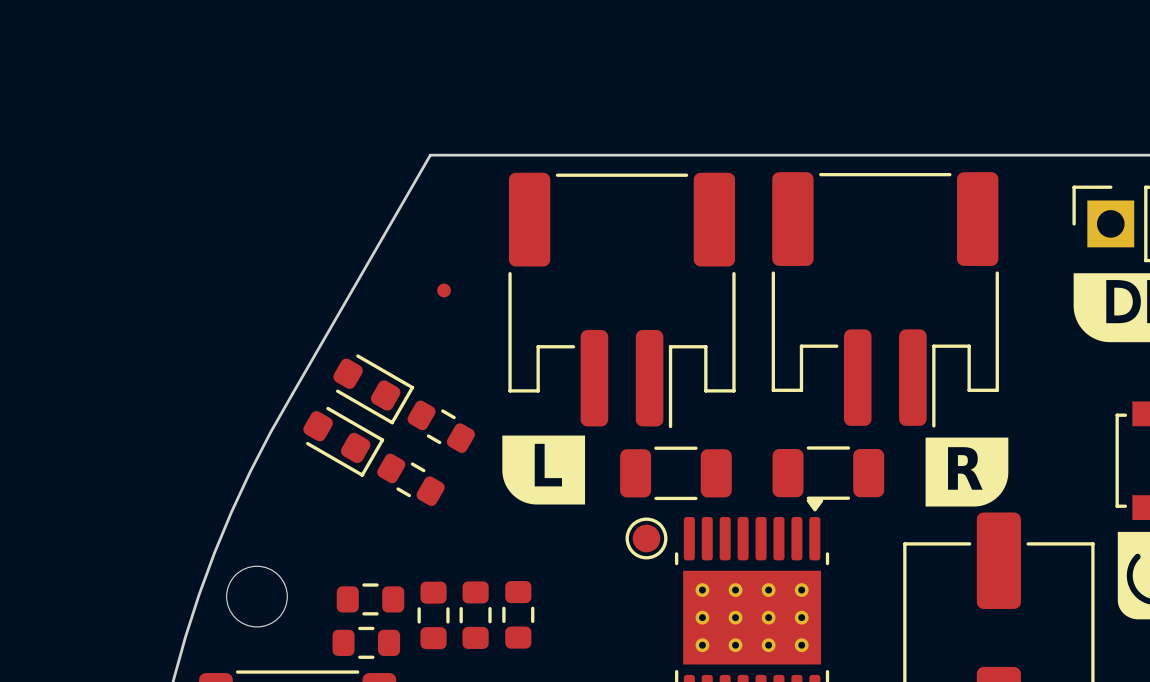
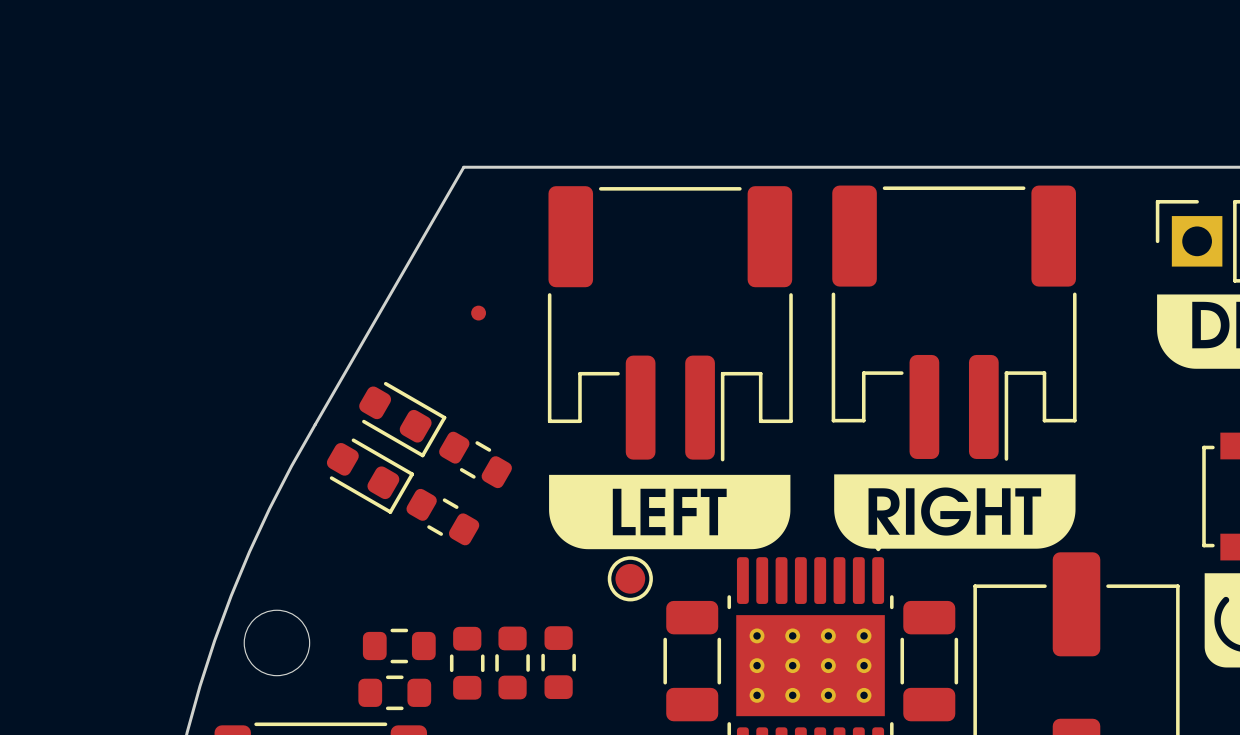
drawing: [502, 435, 586, 505] -> none
drawing: [925, 437, 1009, 507] -> none
drawing: none -> [549, 474, 791, 550]
drawing: none -> [834, 474, 1076, 549]
part: (675, 473) -> none
part: (828, 473) -> none
part position: (646, 538) -> (630, 578)
part: none -> (692, 661)
part: none -> (929, 661)

